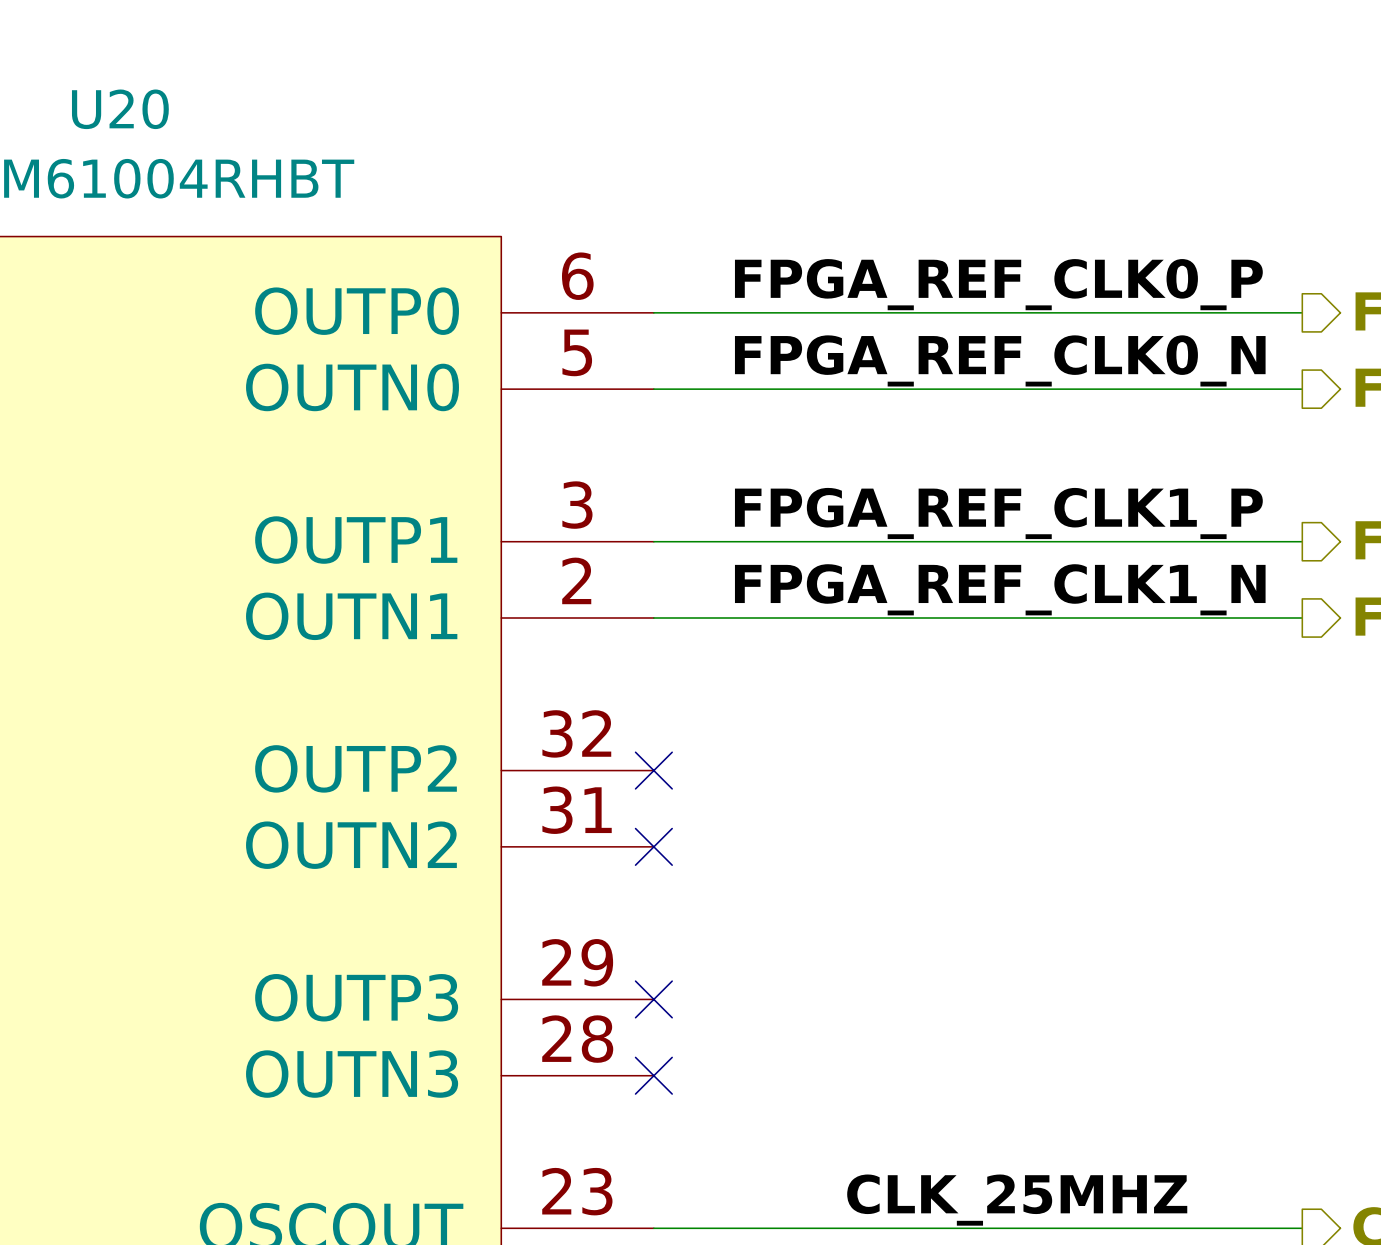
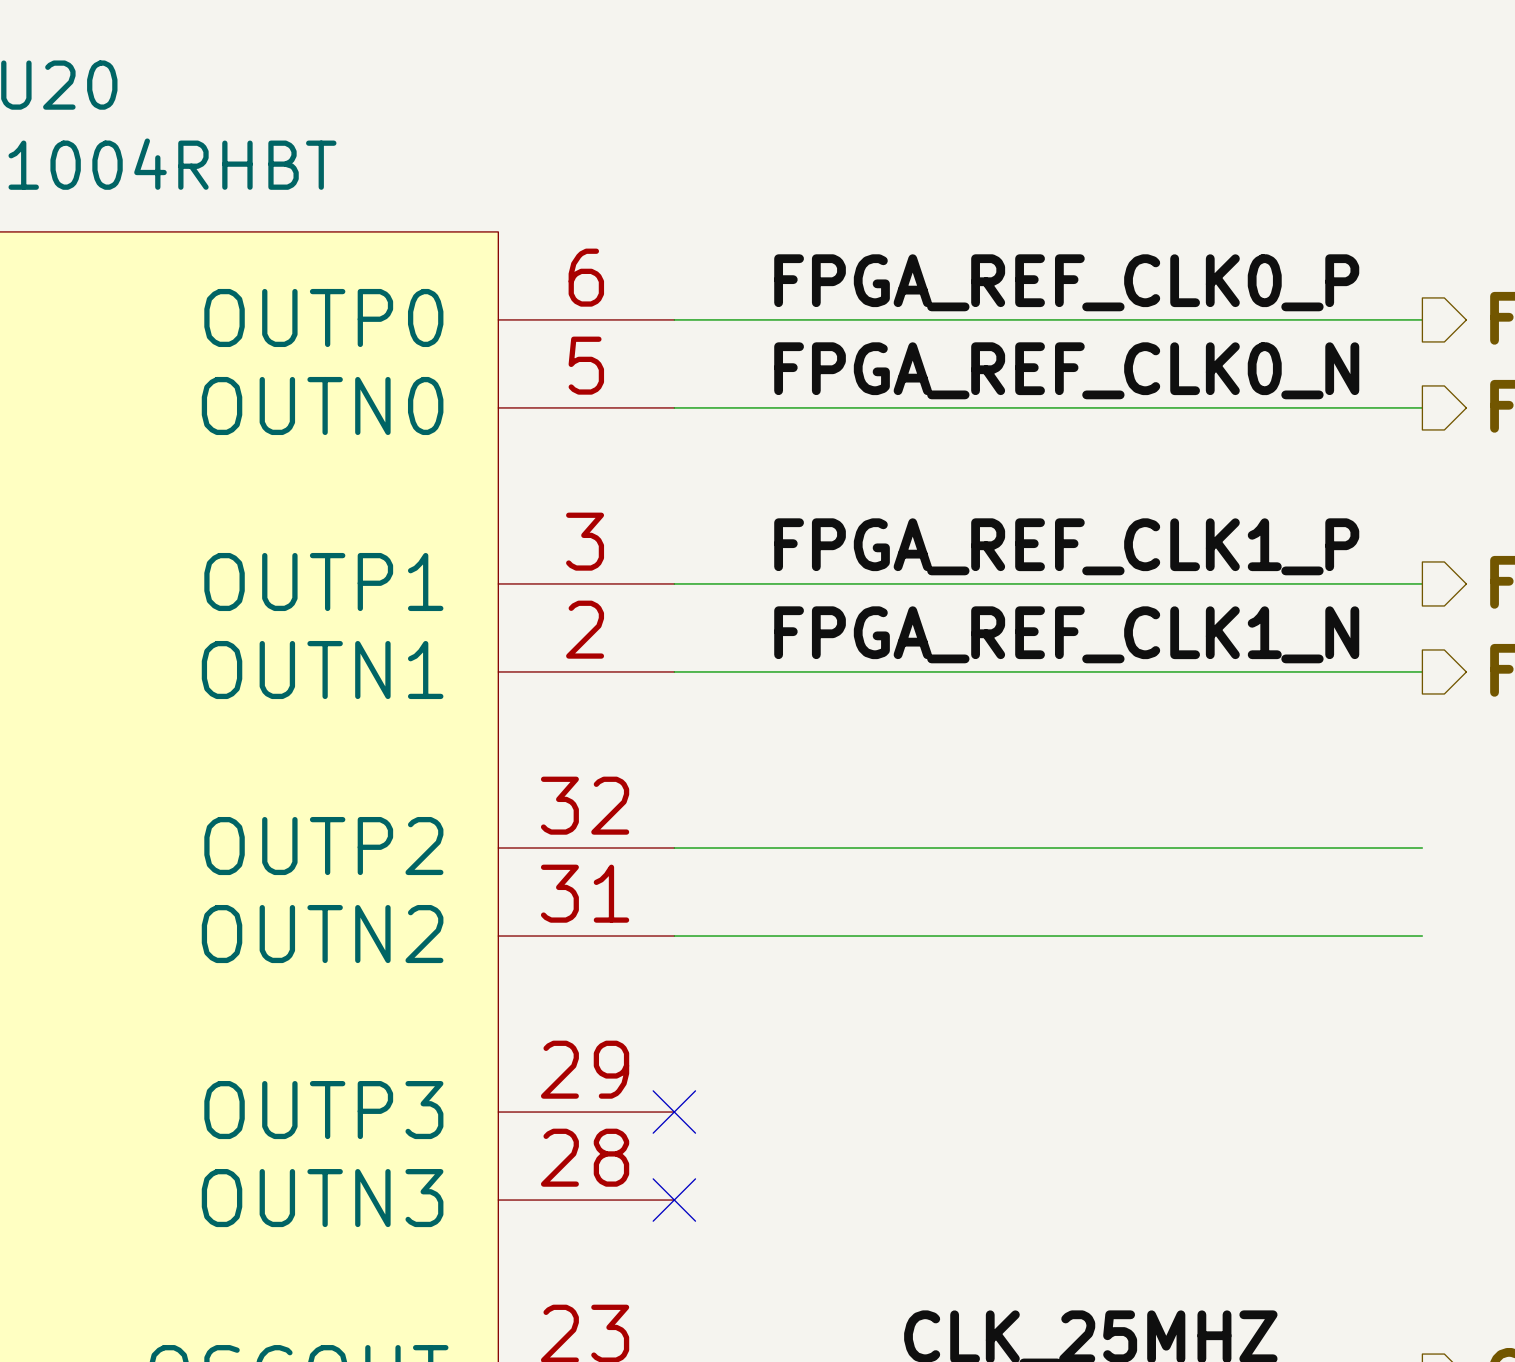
wire: none -> (674, 848) (1422, 848)
no-connect mark: (653, 770) -> none
wire: none -> (674, 936) (1422, 936)
no-connect mark: (653, 846) -> none

